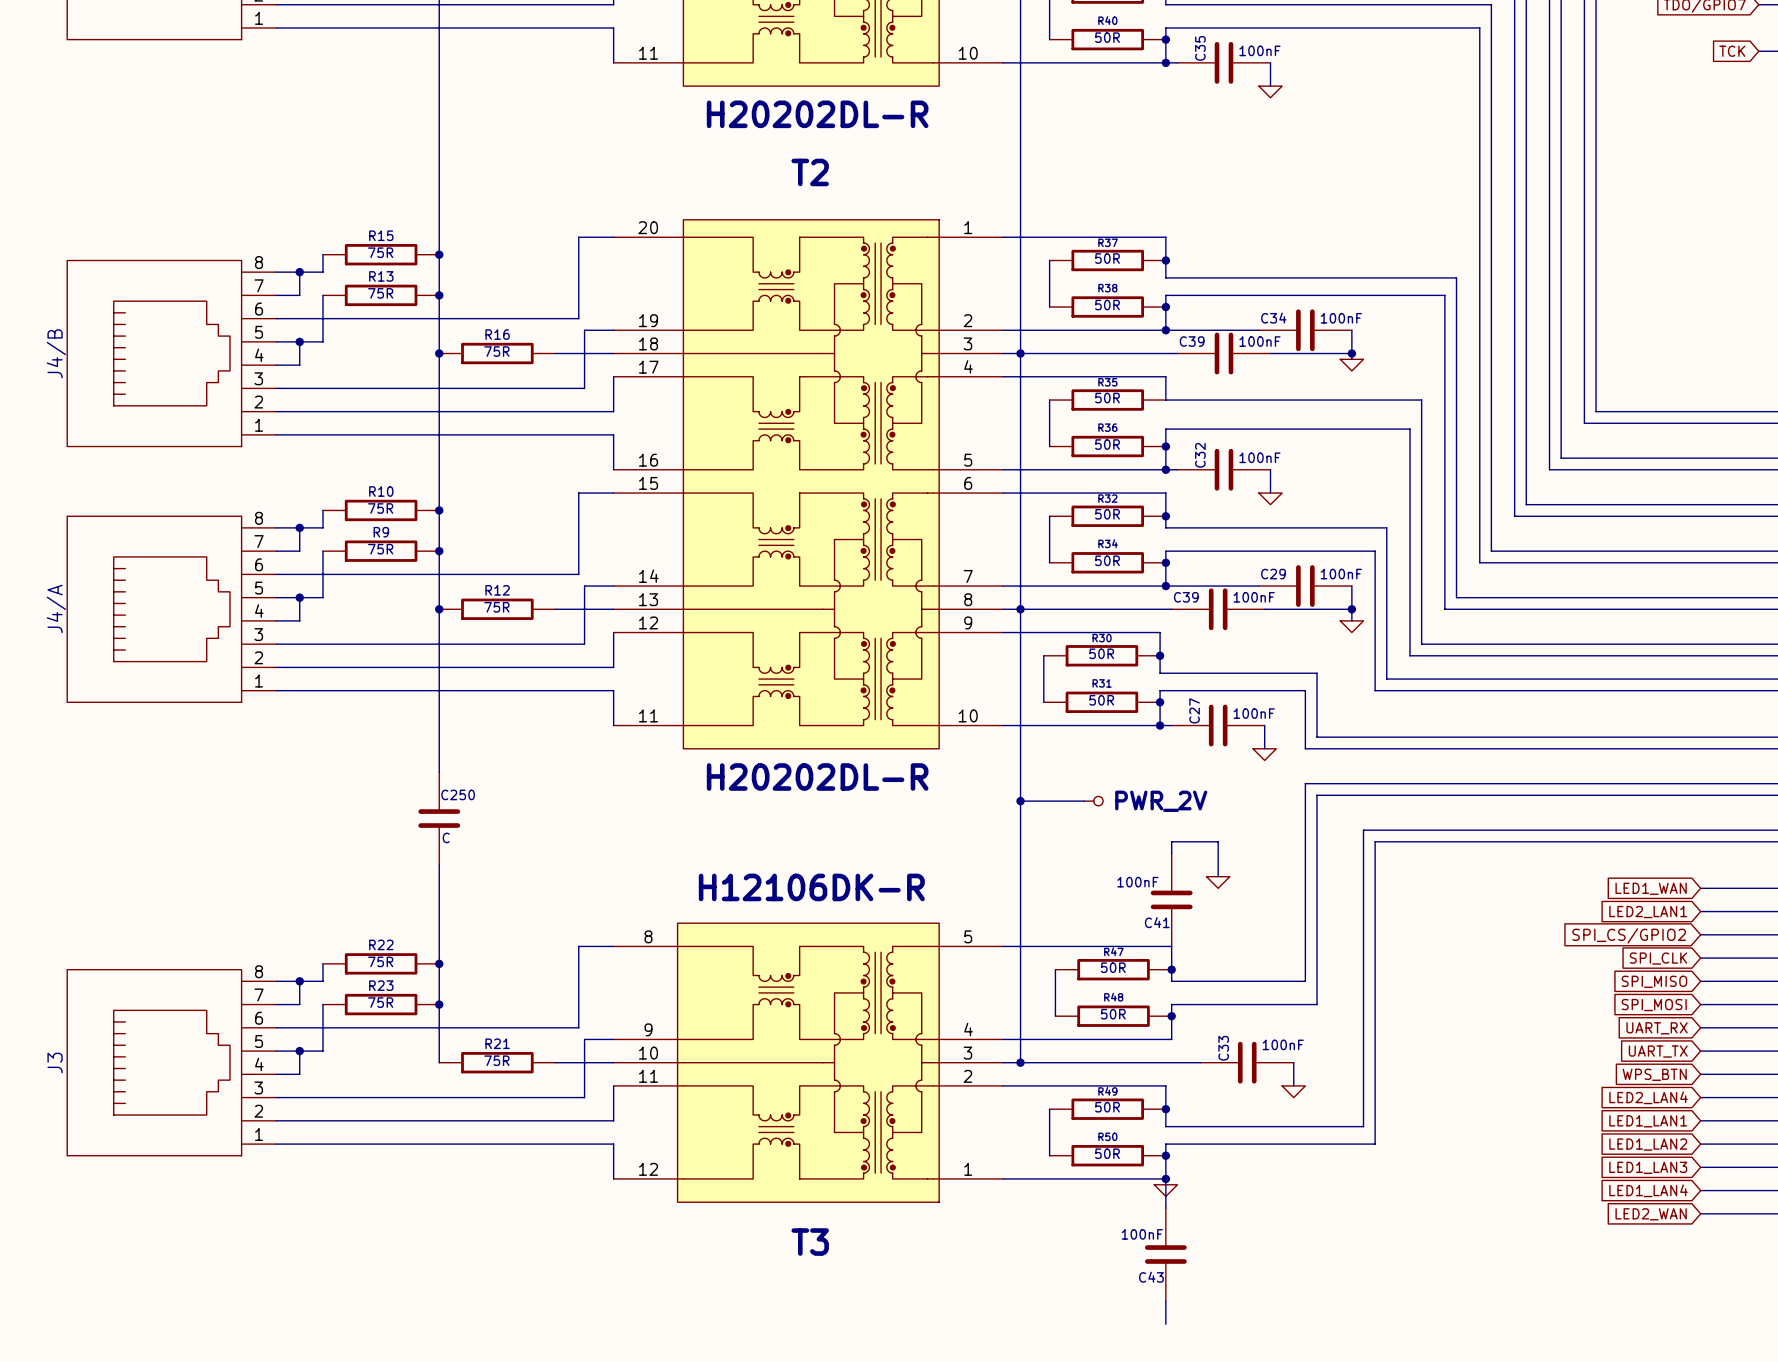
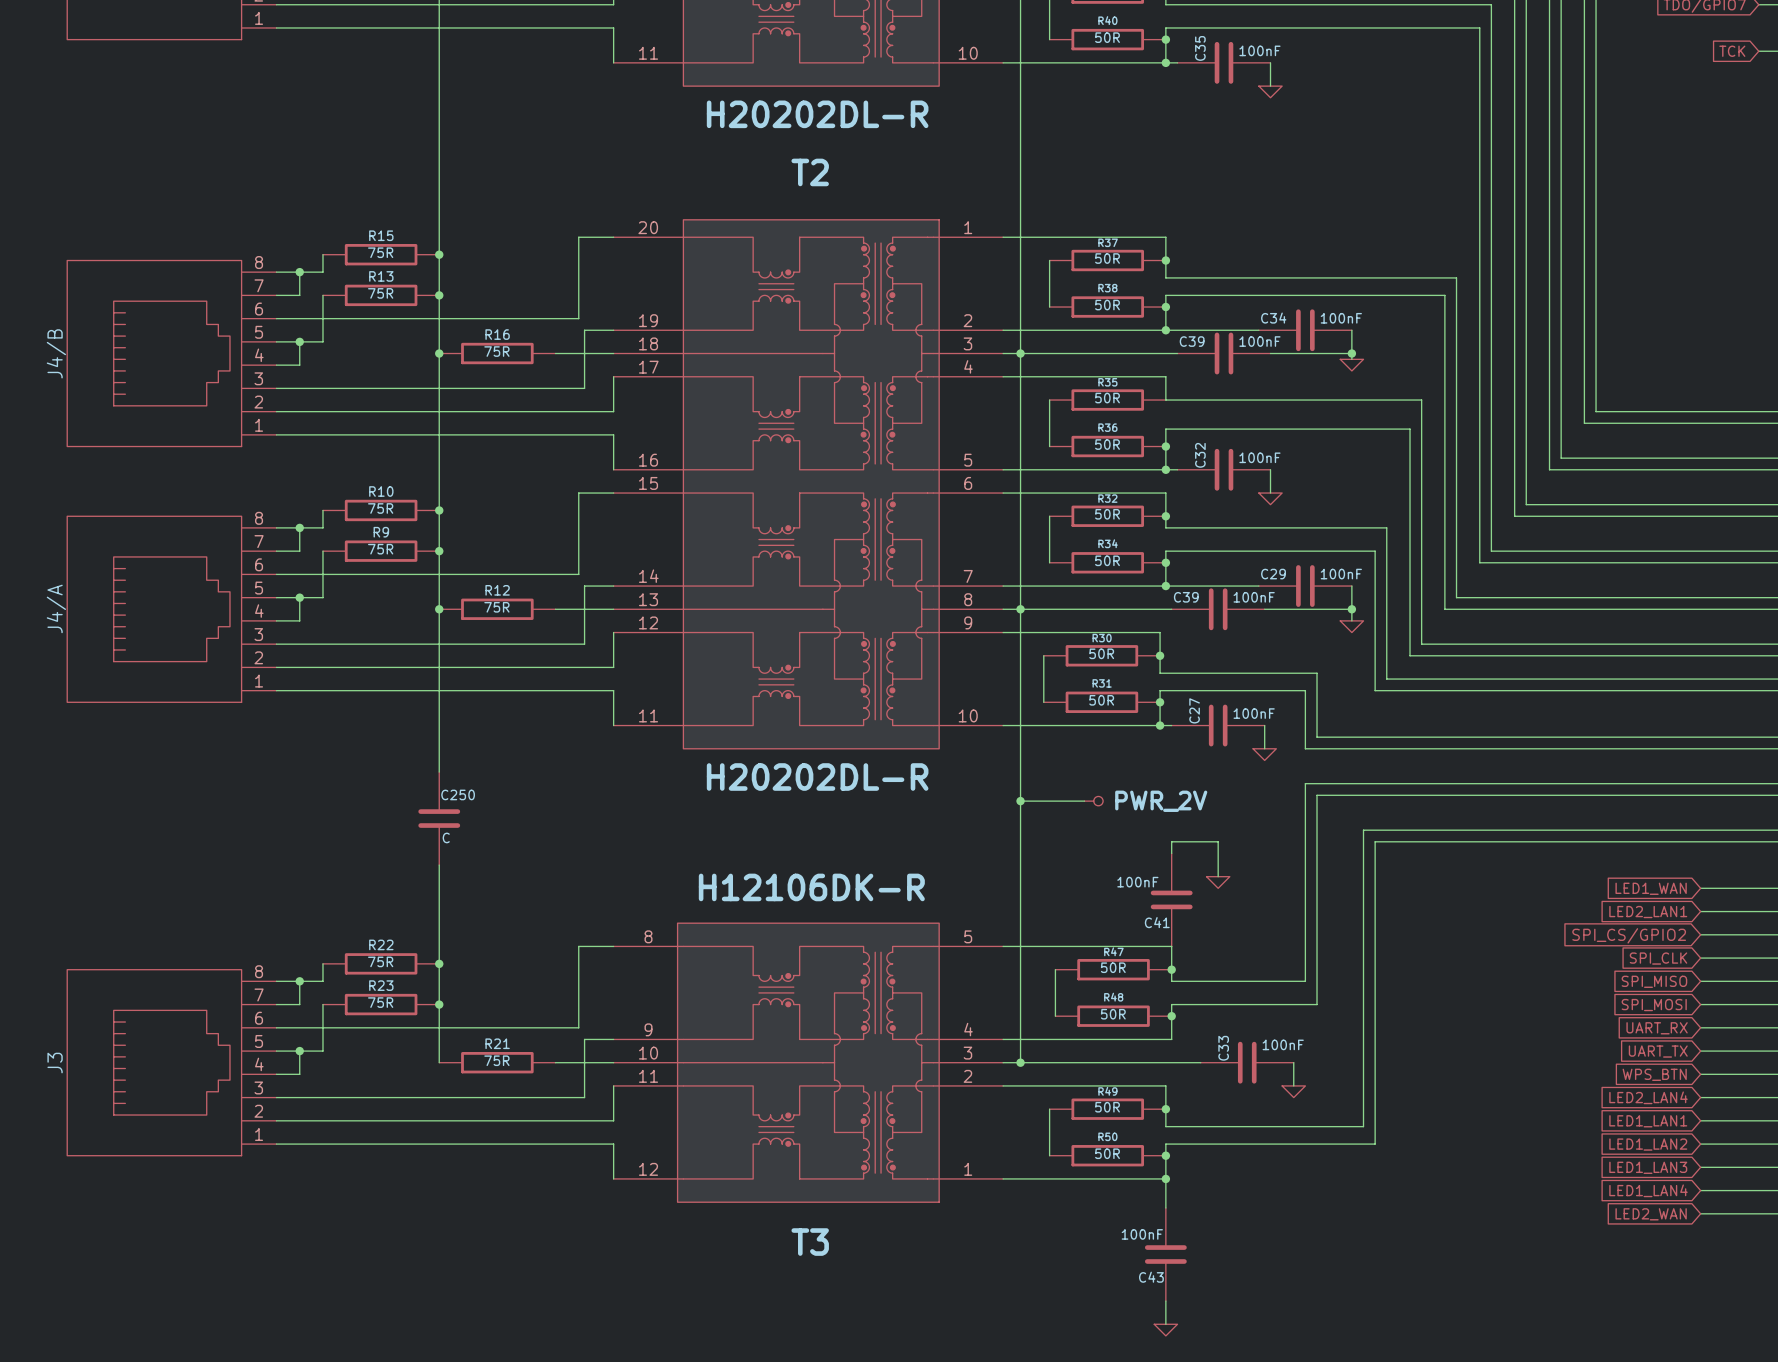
power symbol position: (1165, 1190) -> (1165, 1330)

